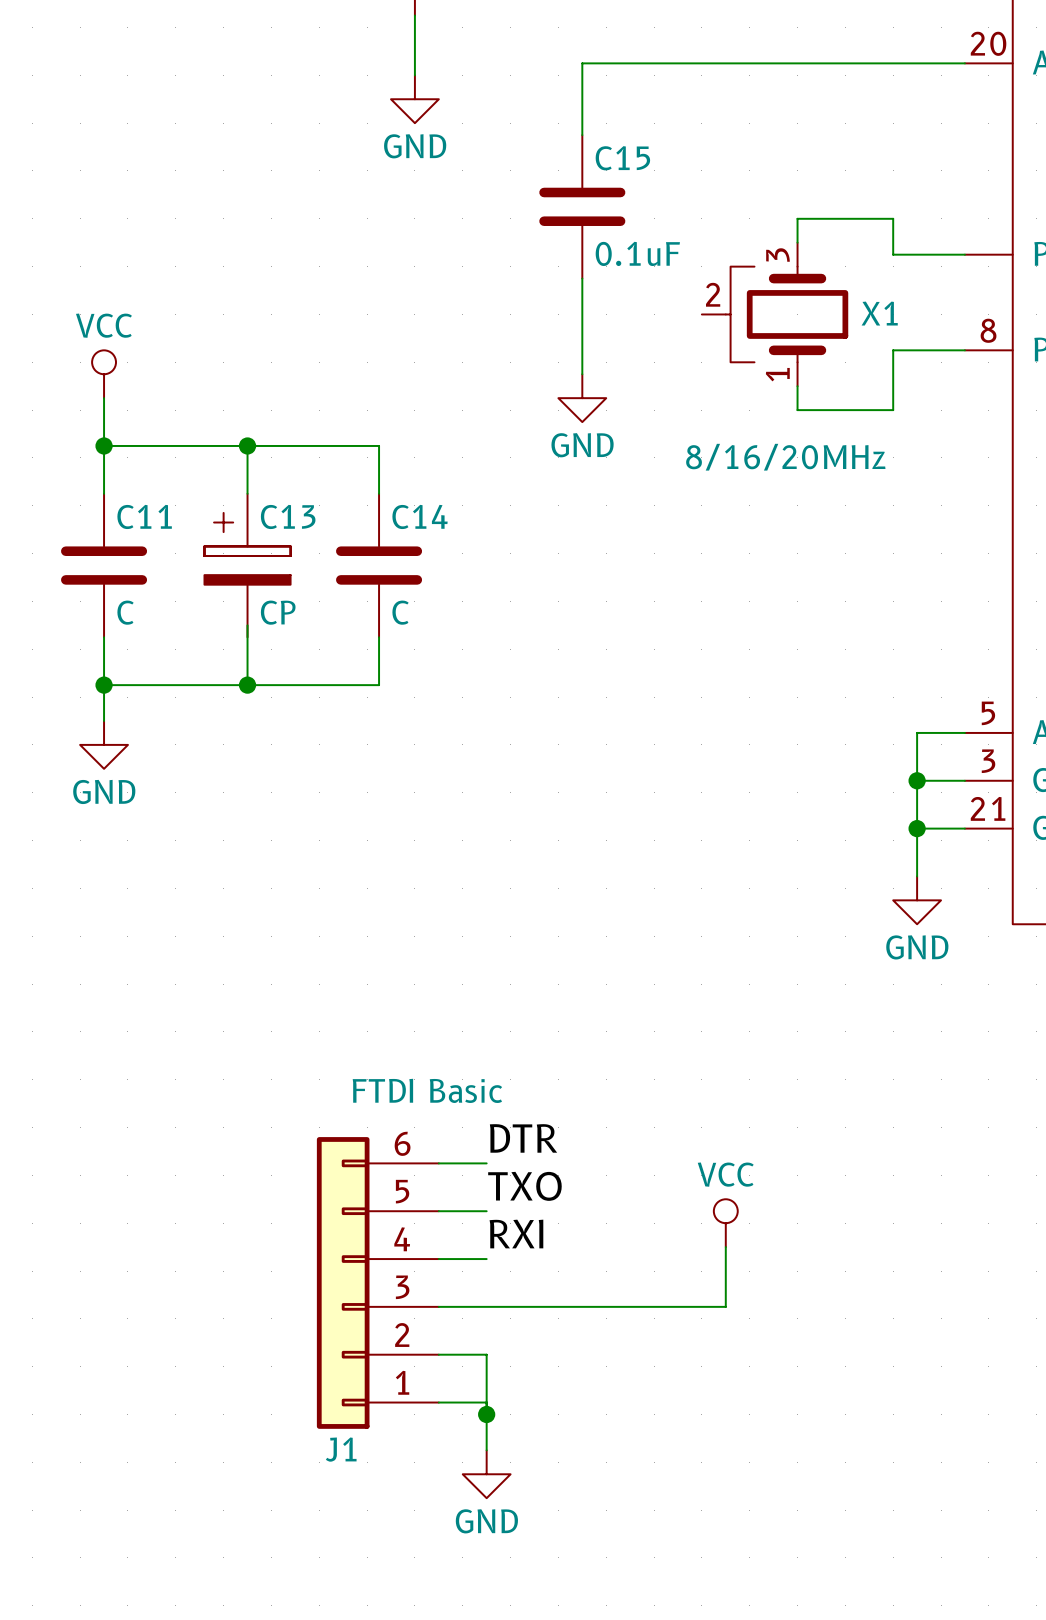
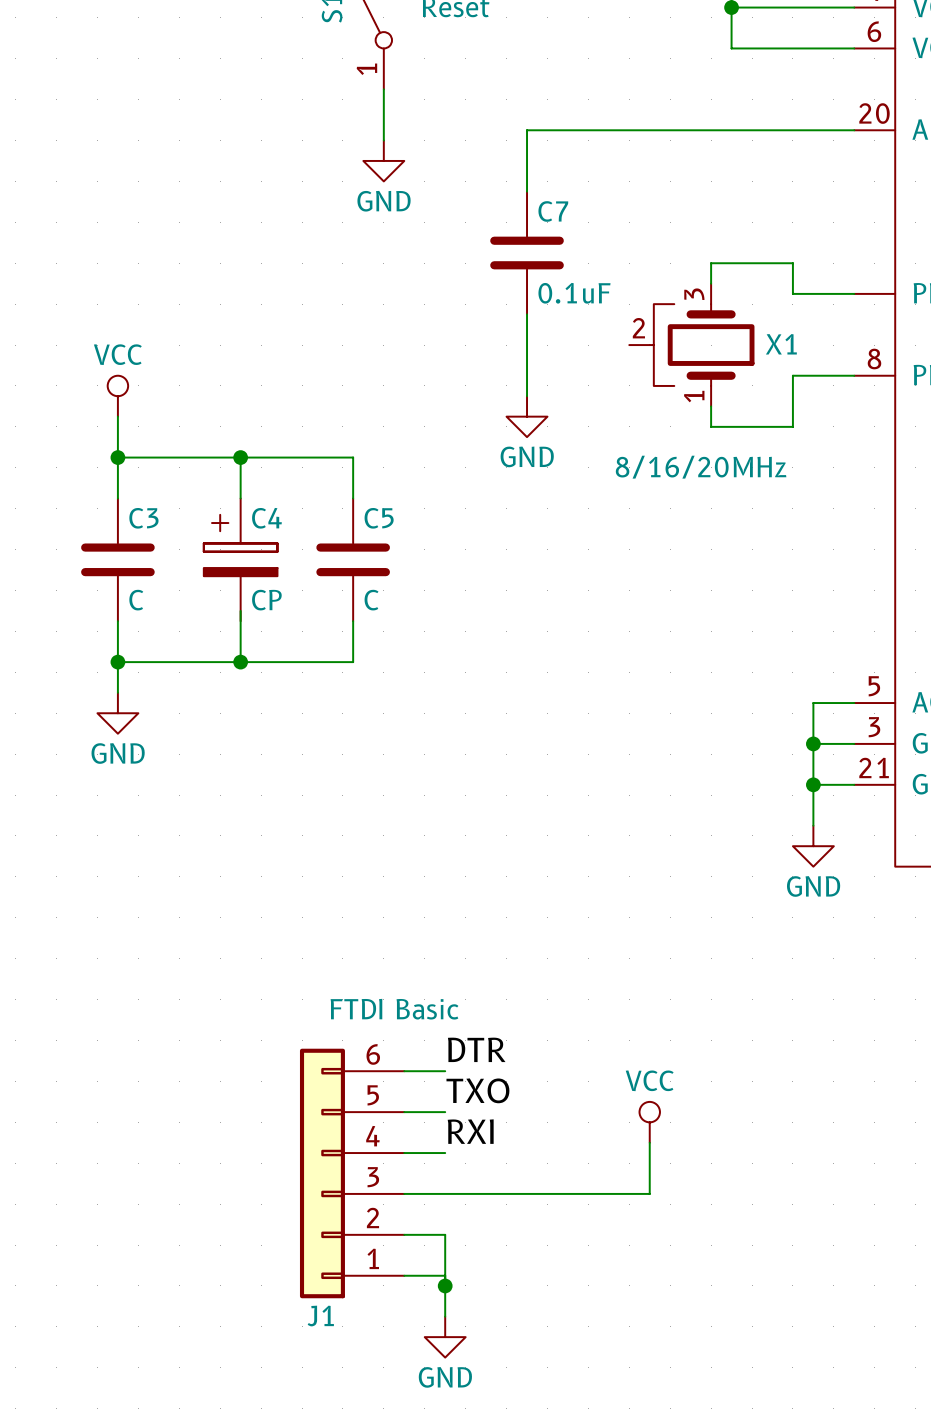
C15 name: C15 (622, 158) -> C7 (553, 211)
C11 name: C11 (144, 516) -> C3 (143, 518)
C13 name: C13 (288, 516) -> C4 (266, 518)
C14 name: C14 (420, 516) -> C5 (379, 518)

